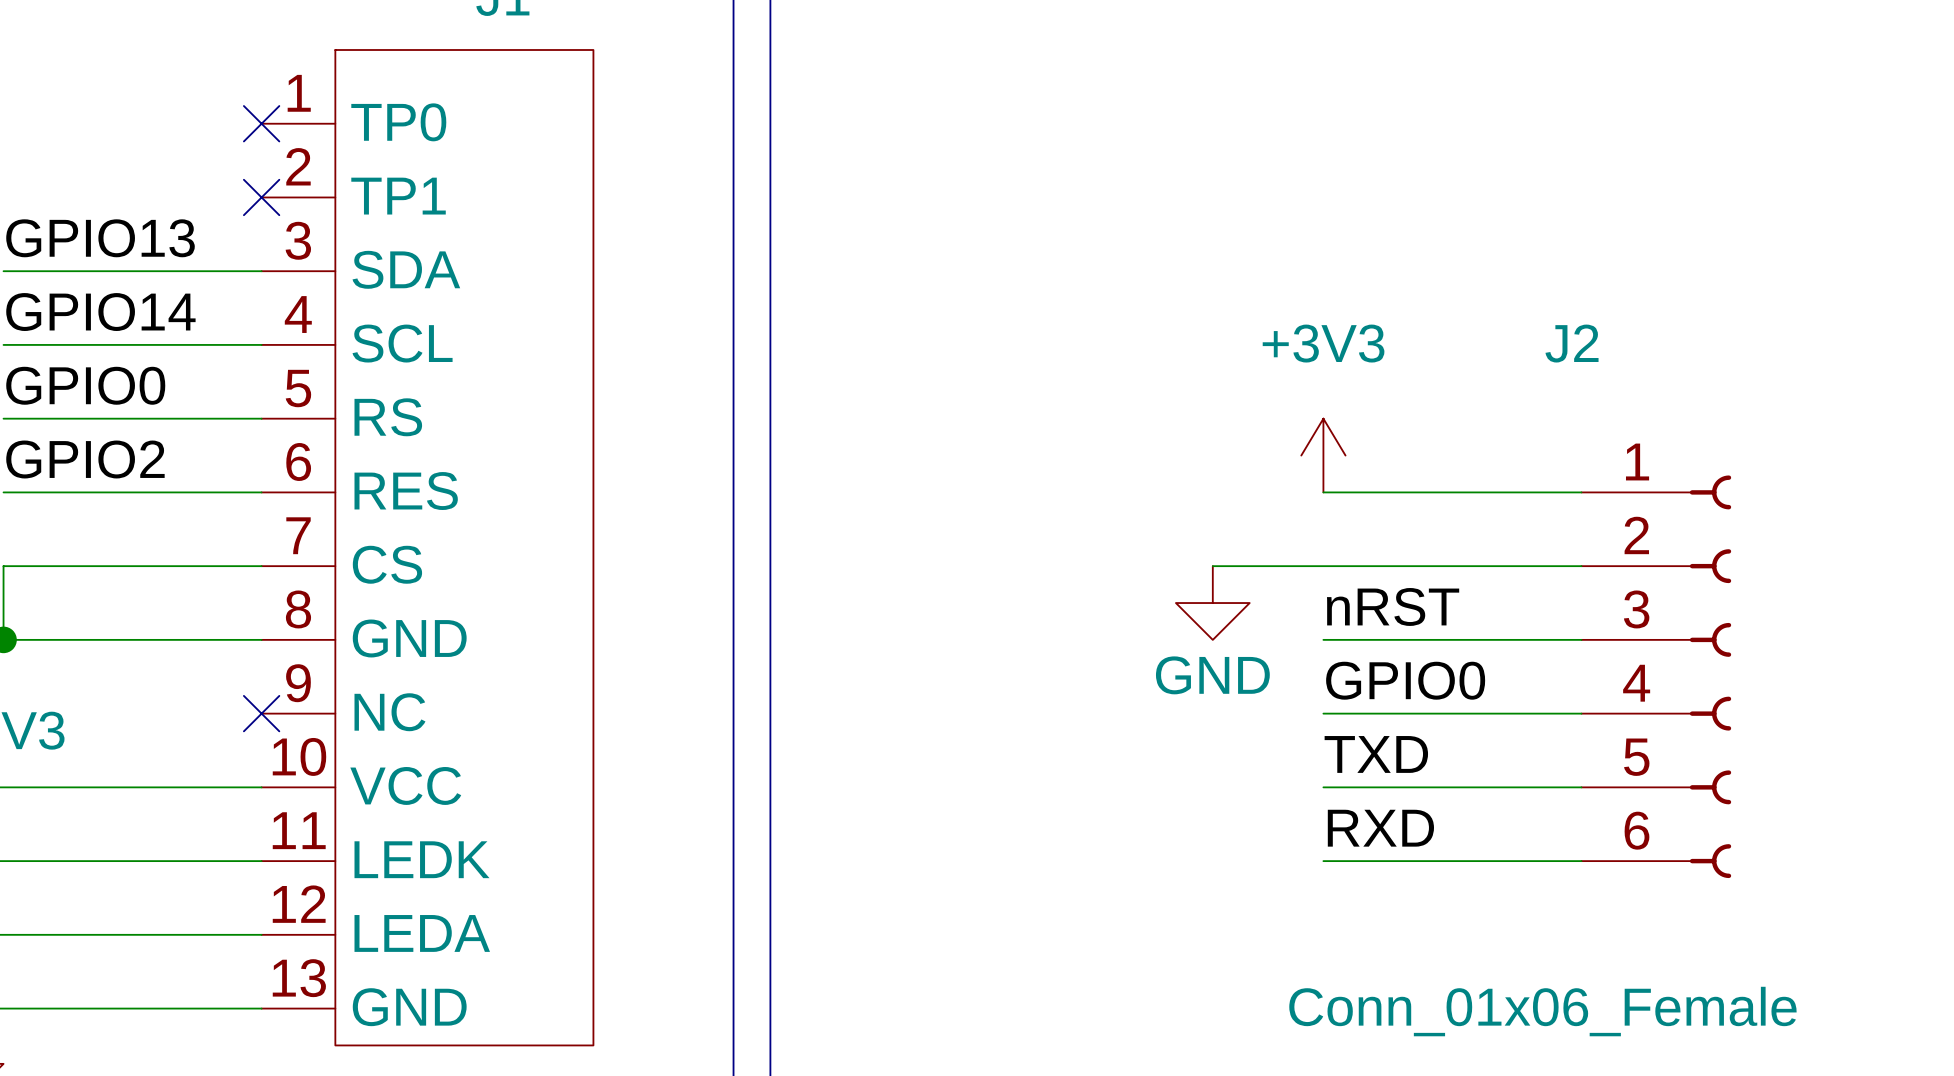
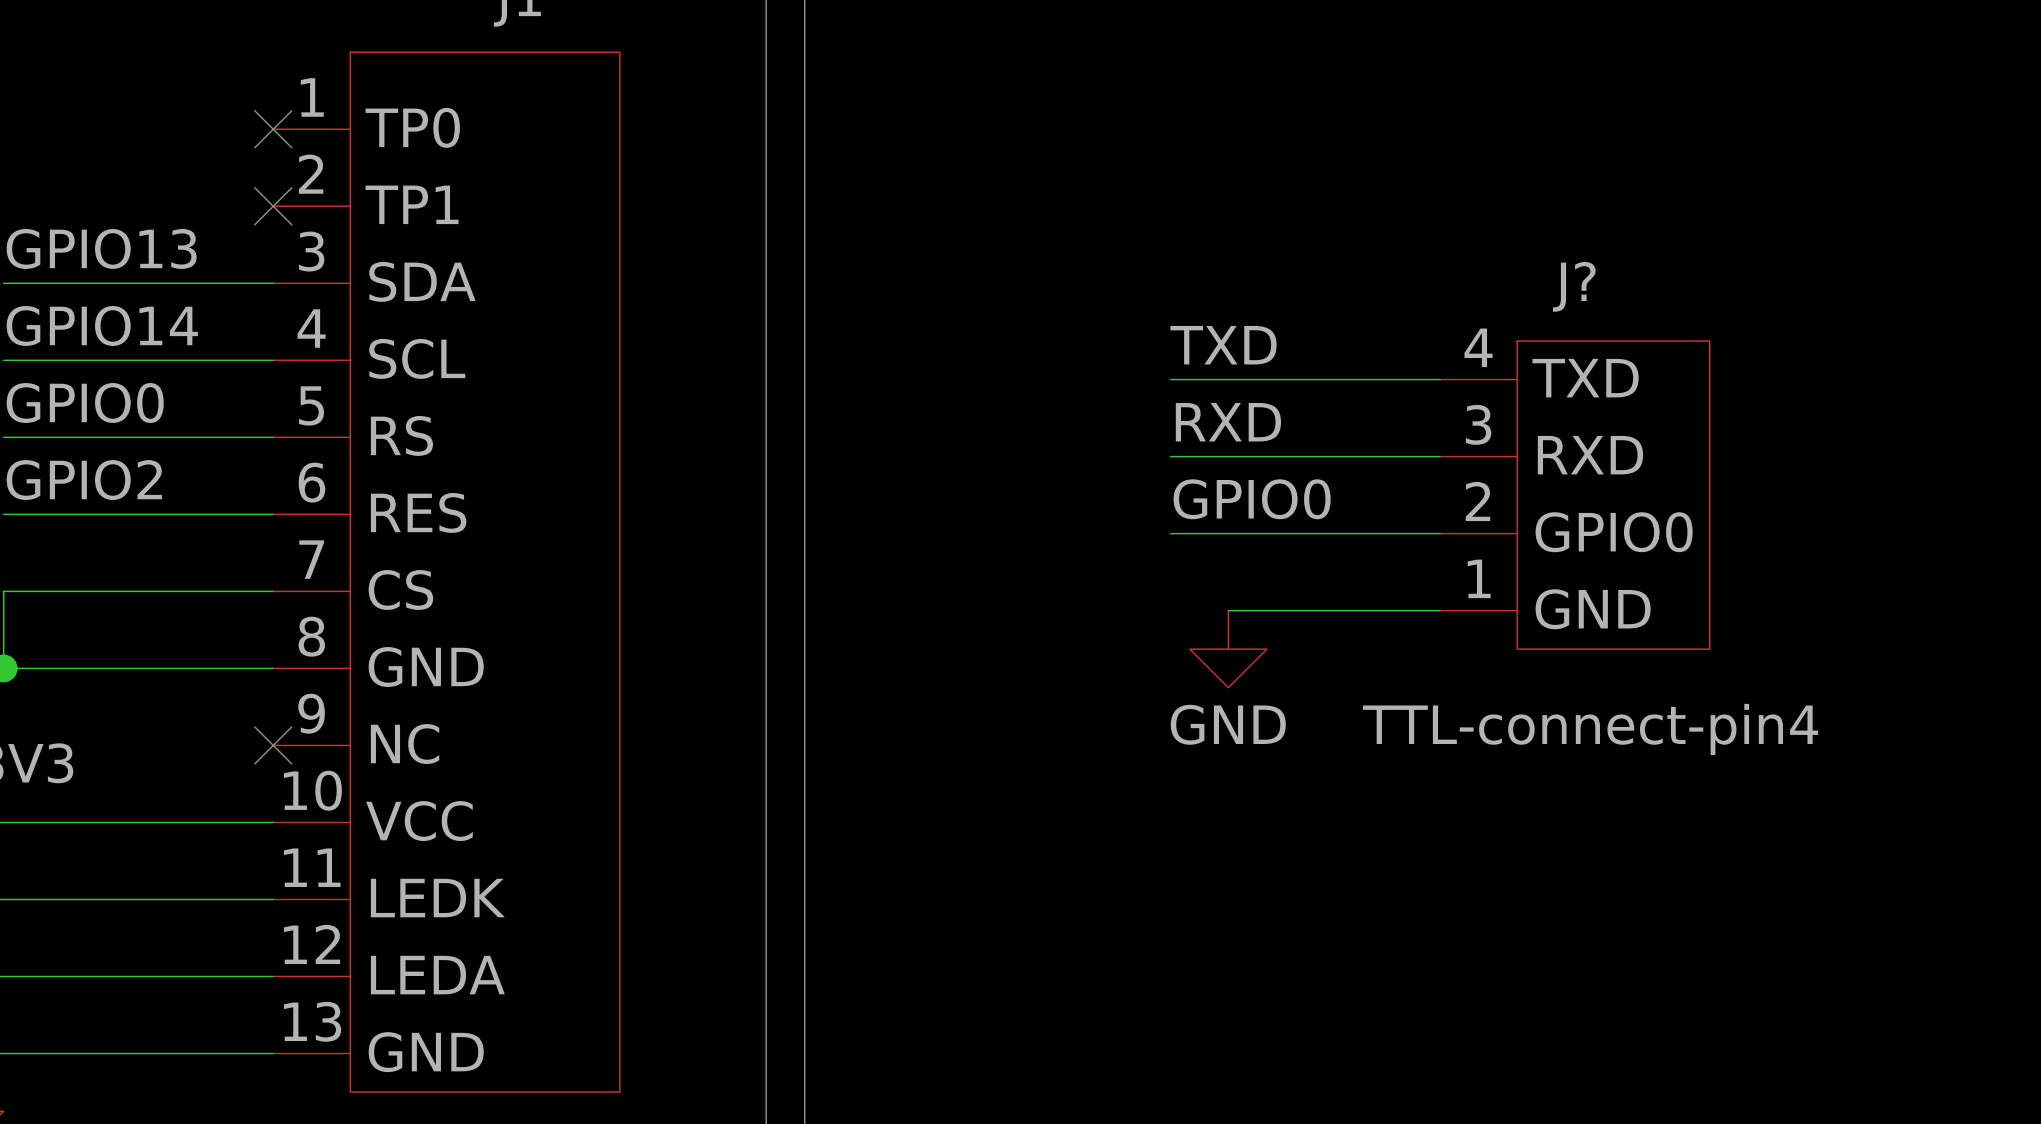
power symbol: +3V3 (1323, 455) -> none
J?: none -> TTL-connect-pin4 (1574, 495)
wire: (1323, 492) (1581, 492) -> none
wire: (1212, 566) (1581, 566) -> none
wire: none -> (1228, 610) (1440, 610)
power symbol position: GND (1212, 603) -> GND (1228, 649)
label: nRST (1393, 606) -> none
wire: (1323, 639) (1581, 639) -> (1170, 379) (1440, 379)
J2: Conn_01x06_Female (1656, 676) -> none
label position: GPIO0 (1405, 680) -> GPIO0 (1252, 499)
wire: (1323, 713) (1581, 713) -> (1170, 456) (1440, 456)
label position: TXD (1376, 754) -> TXD (1223, 345)
wire: (1323, 787) (1581, 787) -> (1170, 533) (1440, 533)
label position: RXD (1380, 828) -> RXD (1228, 422)
wire: (1323, 861) (1581, 861) -> none

